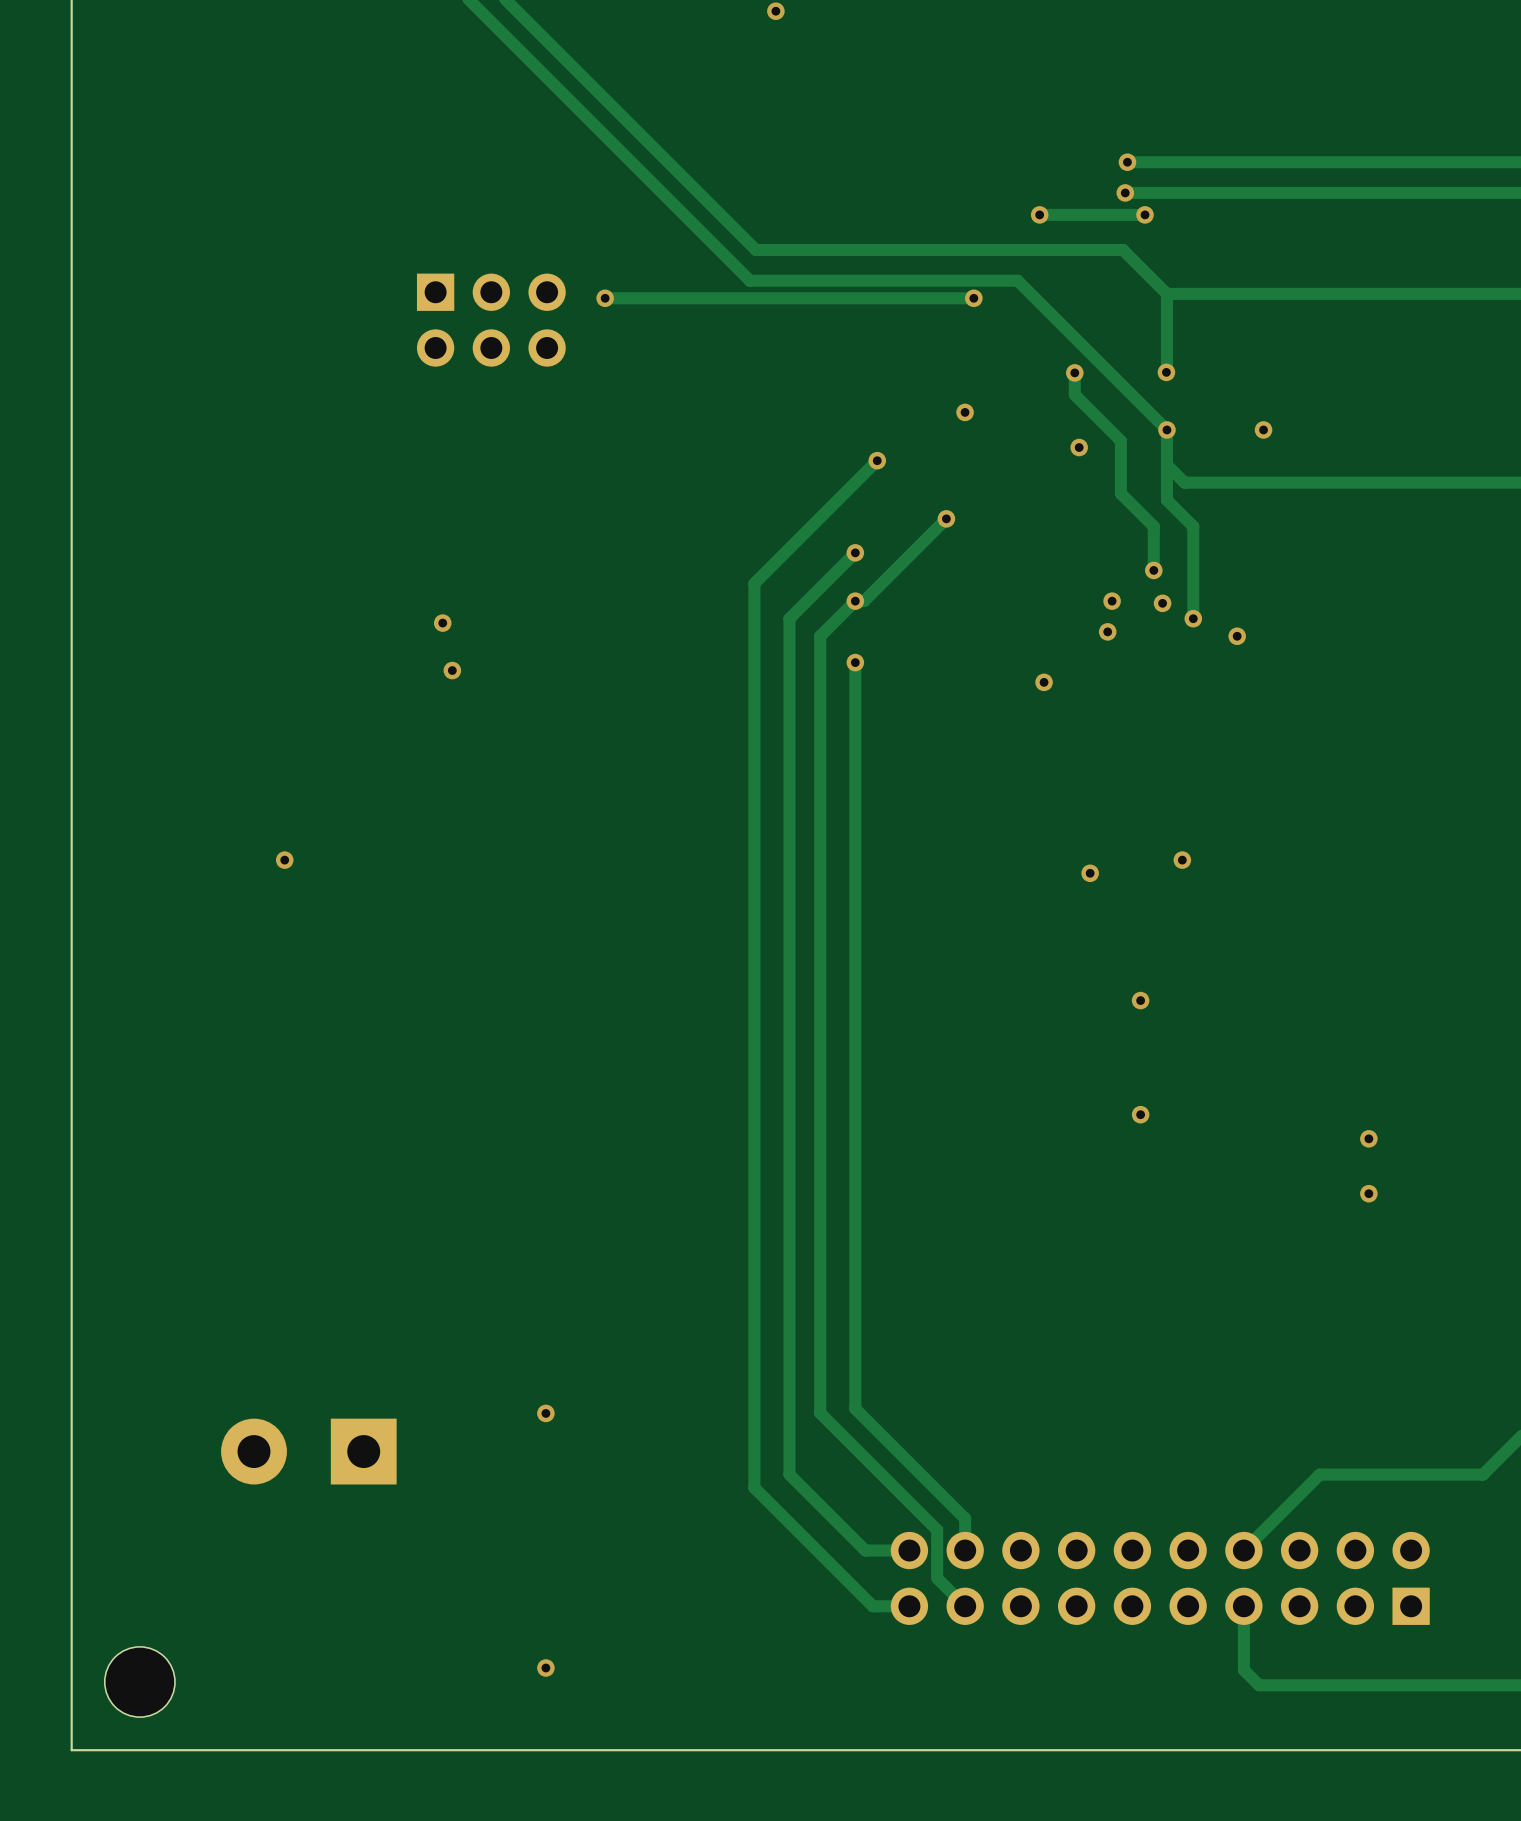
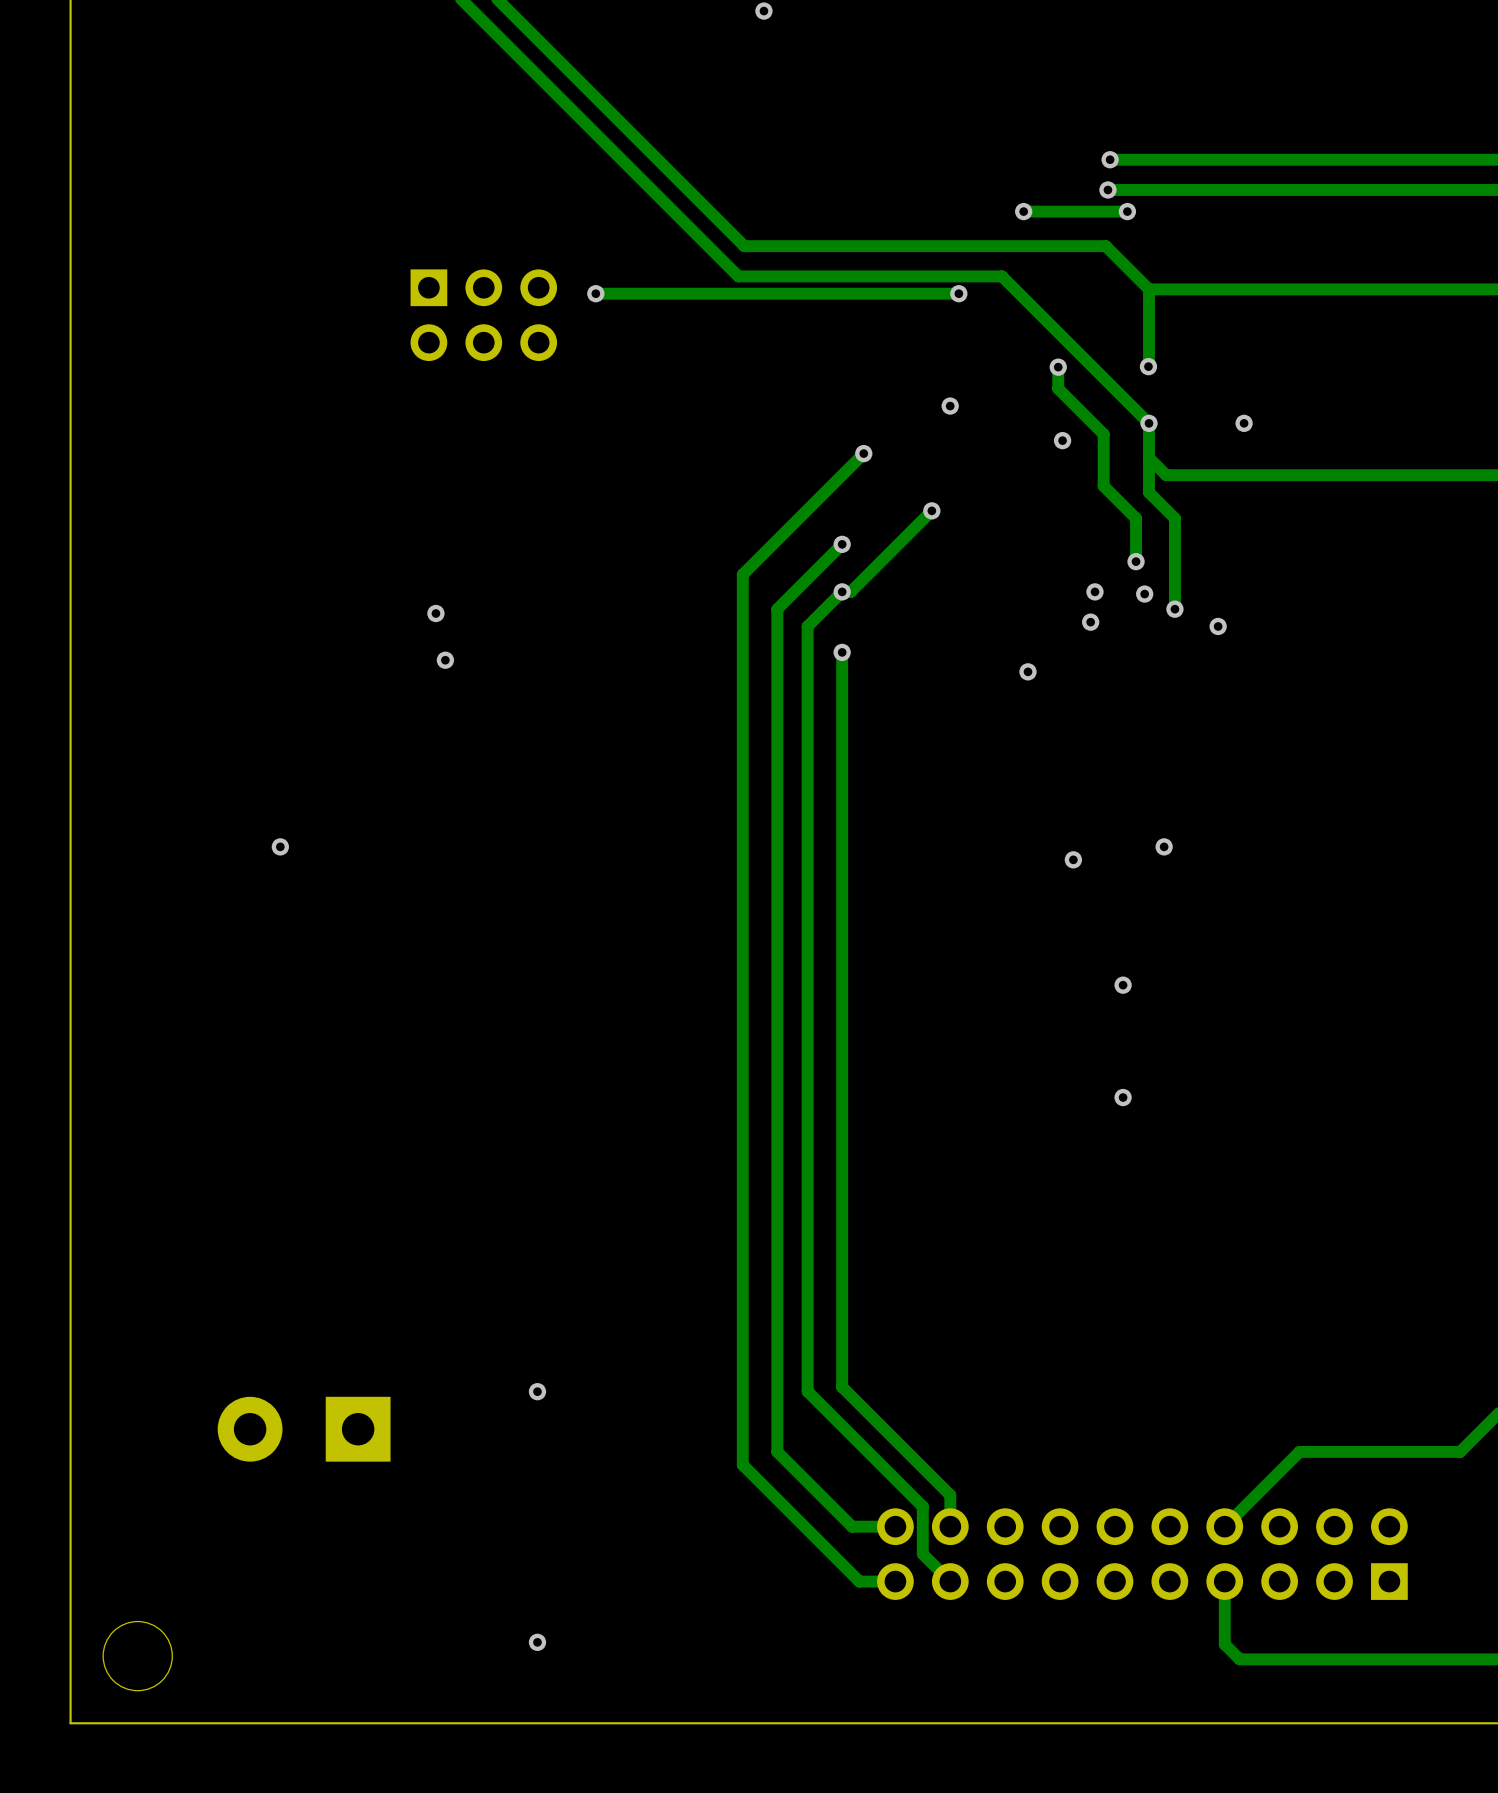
via: (1368, 1138) -> none
via: (1368, 1193) -> none

